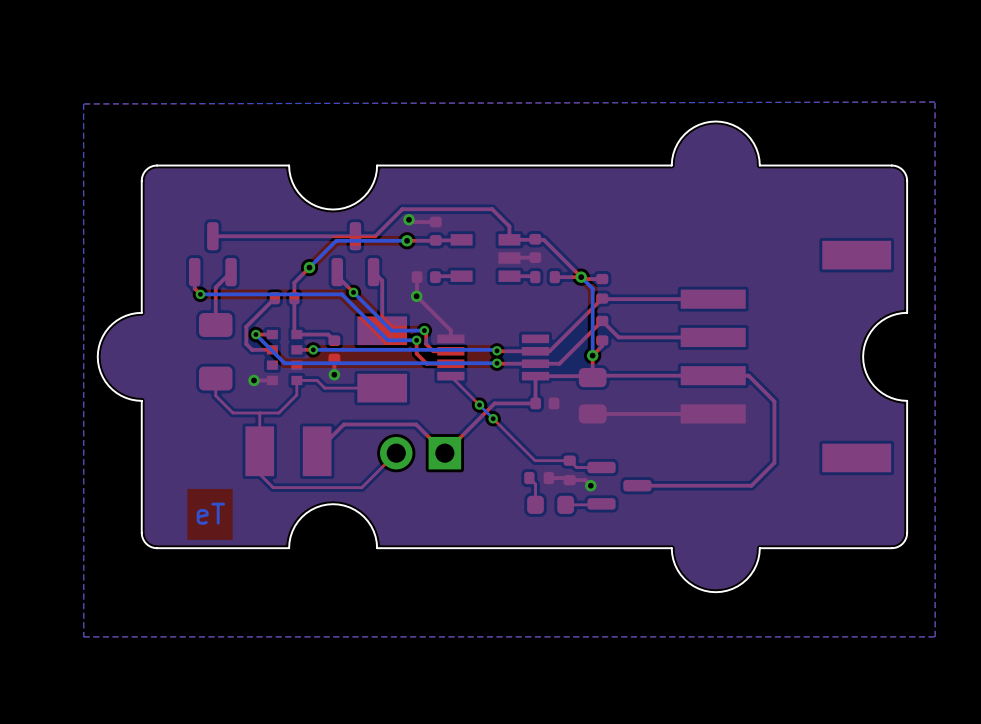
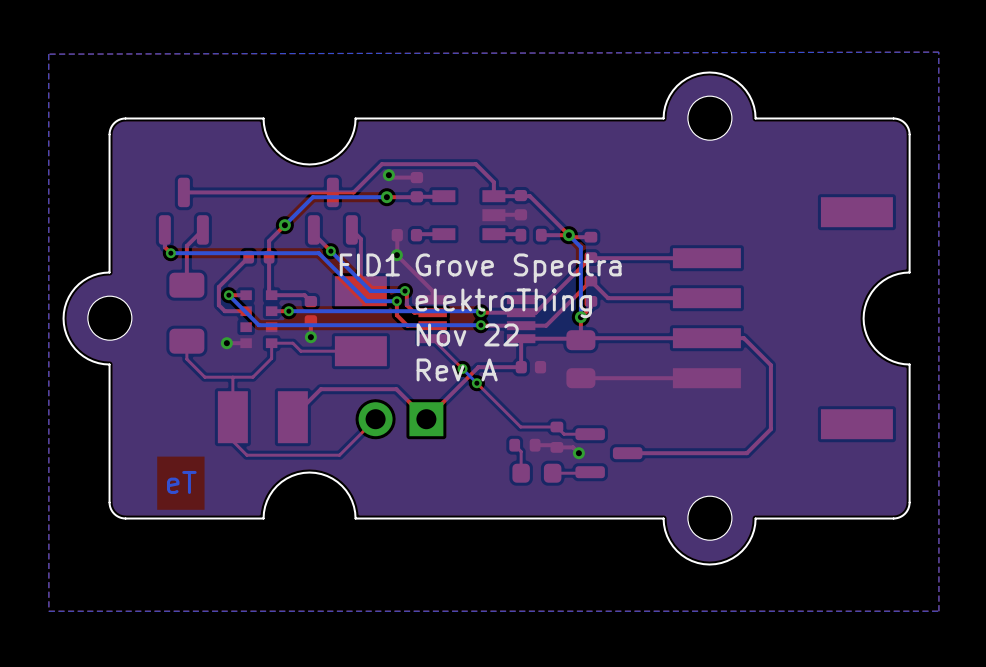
part: none -> (709, 118)
FID1: none -> (480, 317)
part: none -> (109, 318)
part: none -> (709, 518)

